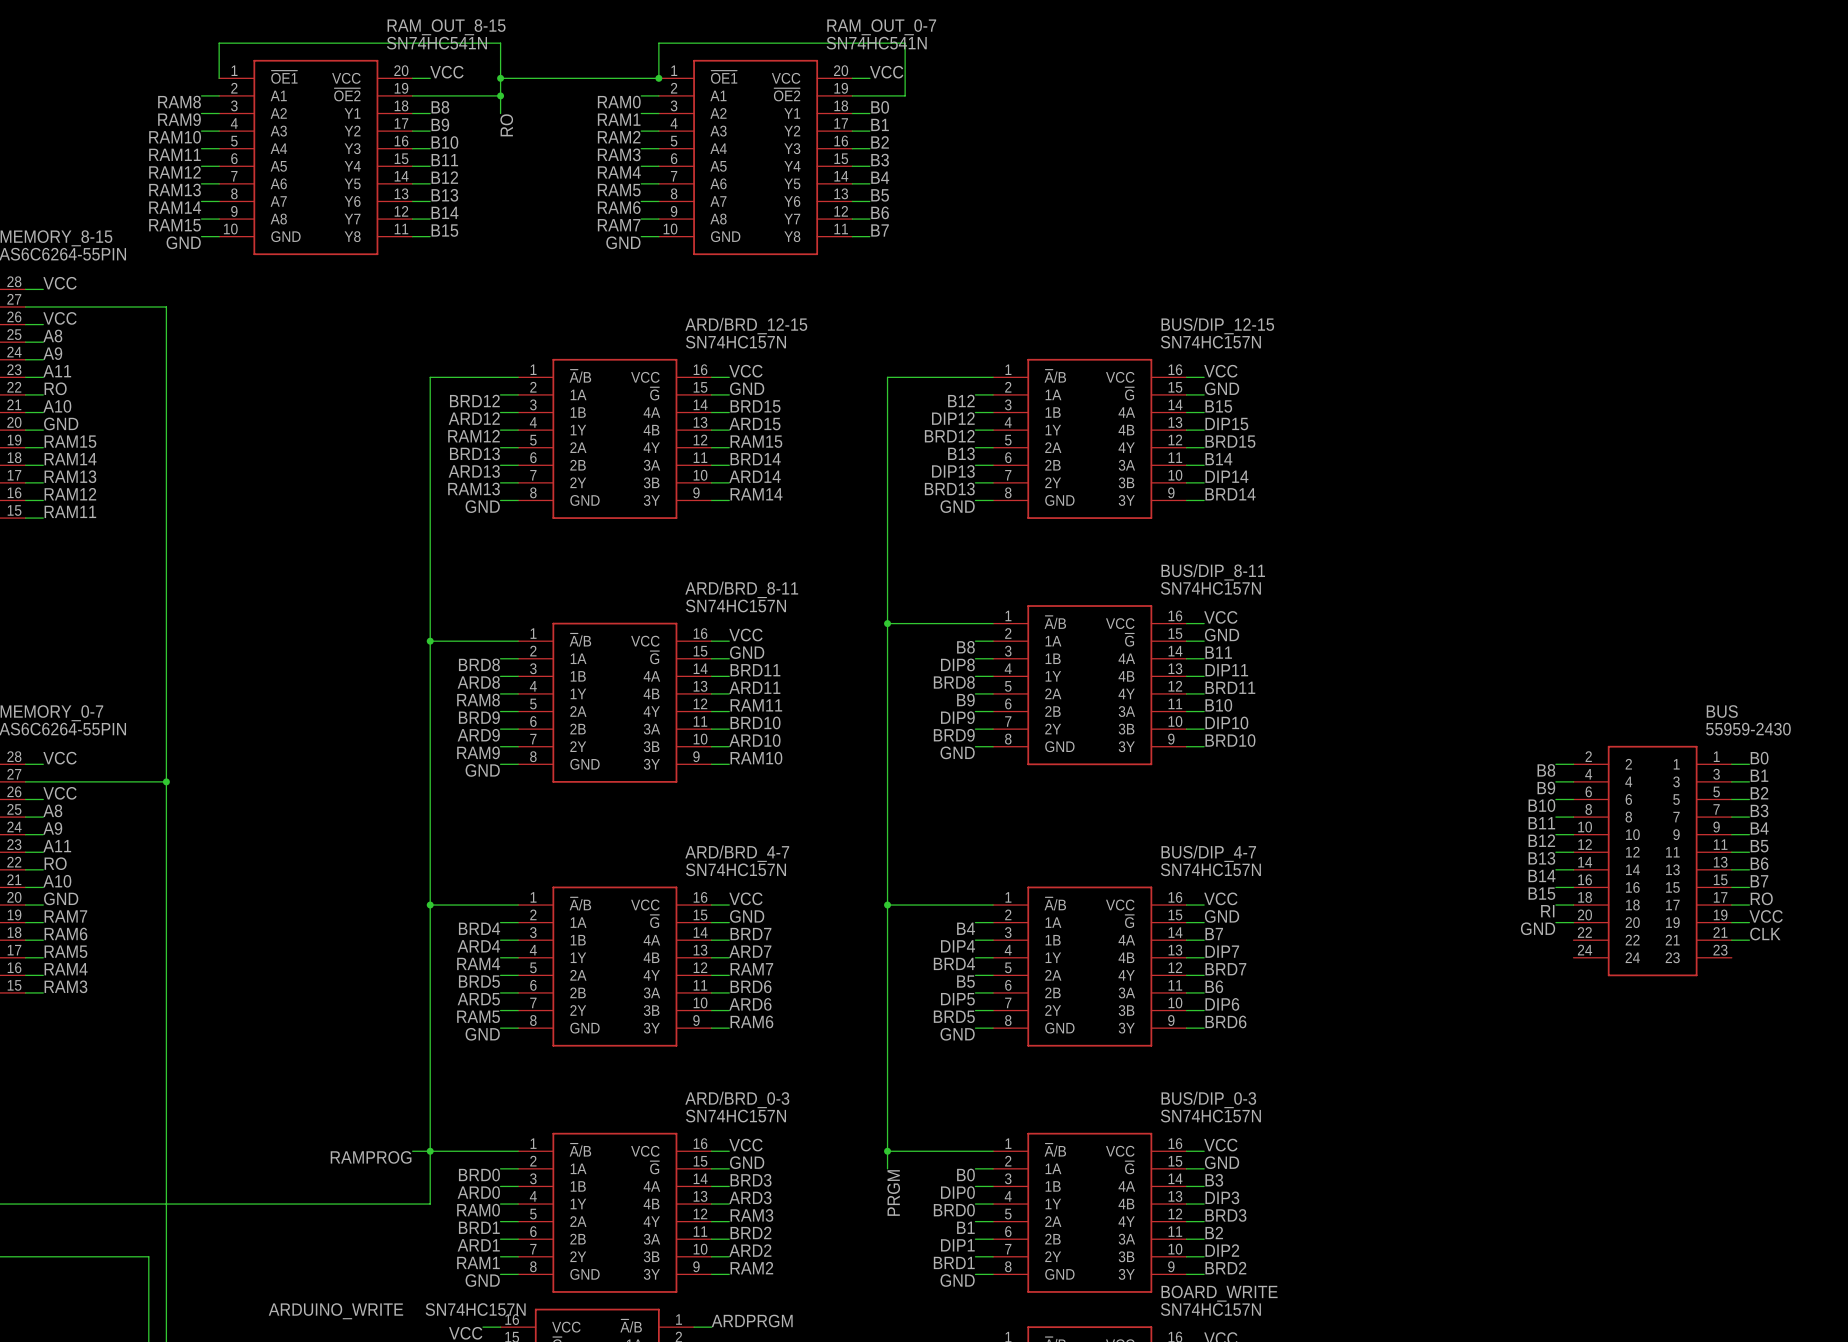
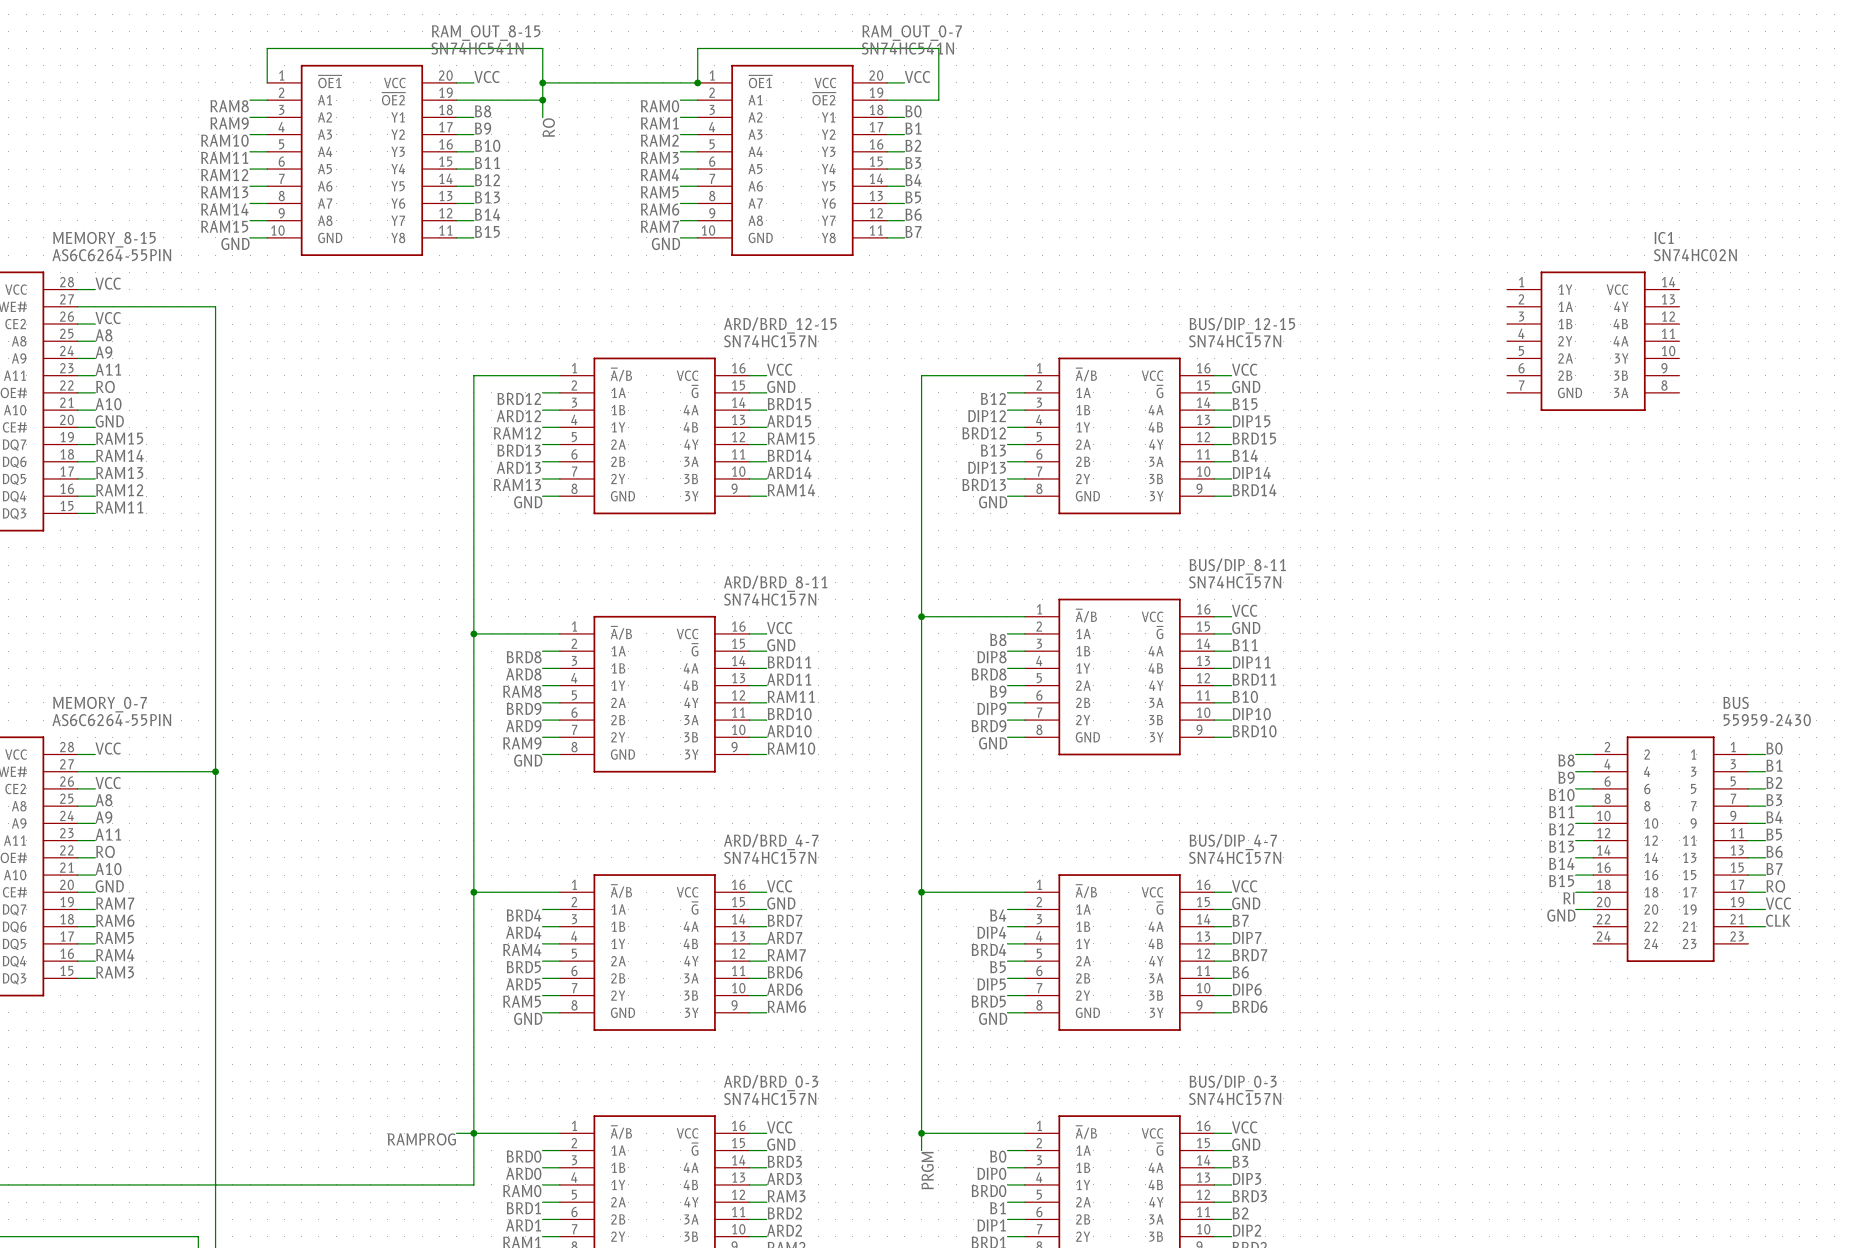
IC1: none -> SN74HC02N (1593, 341)

